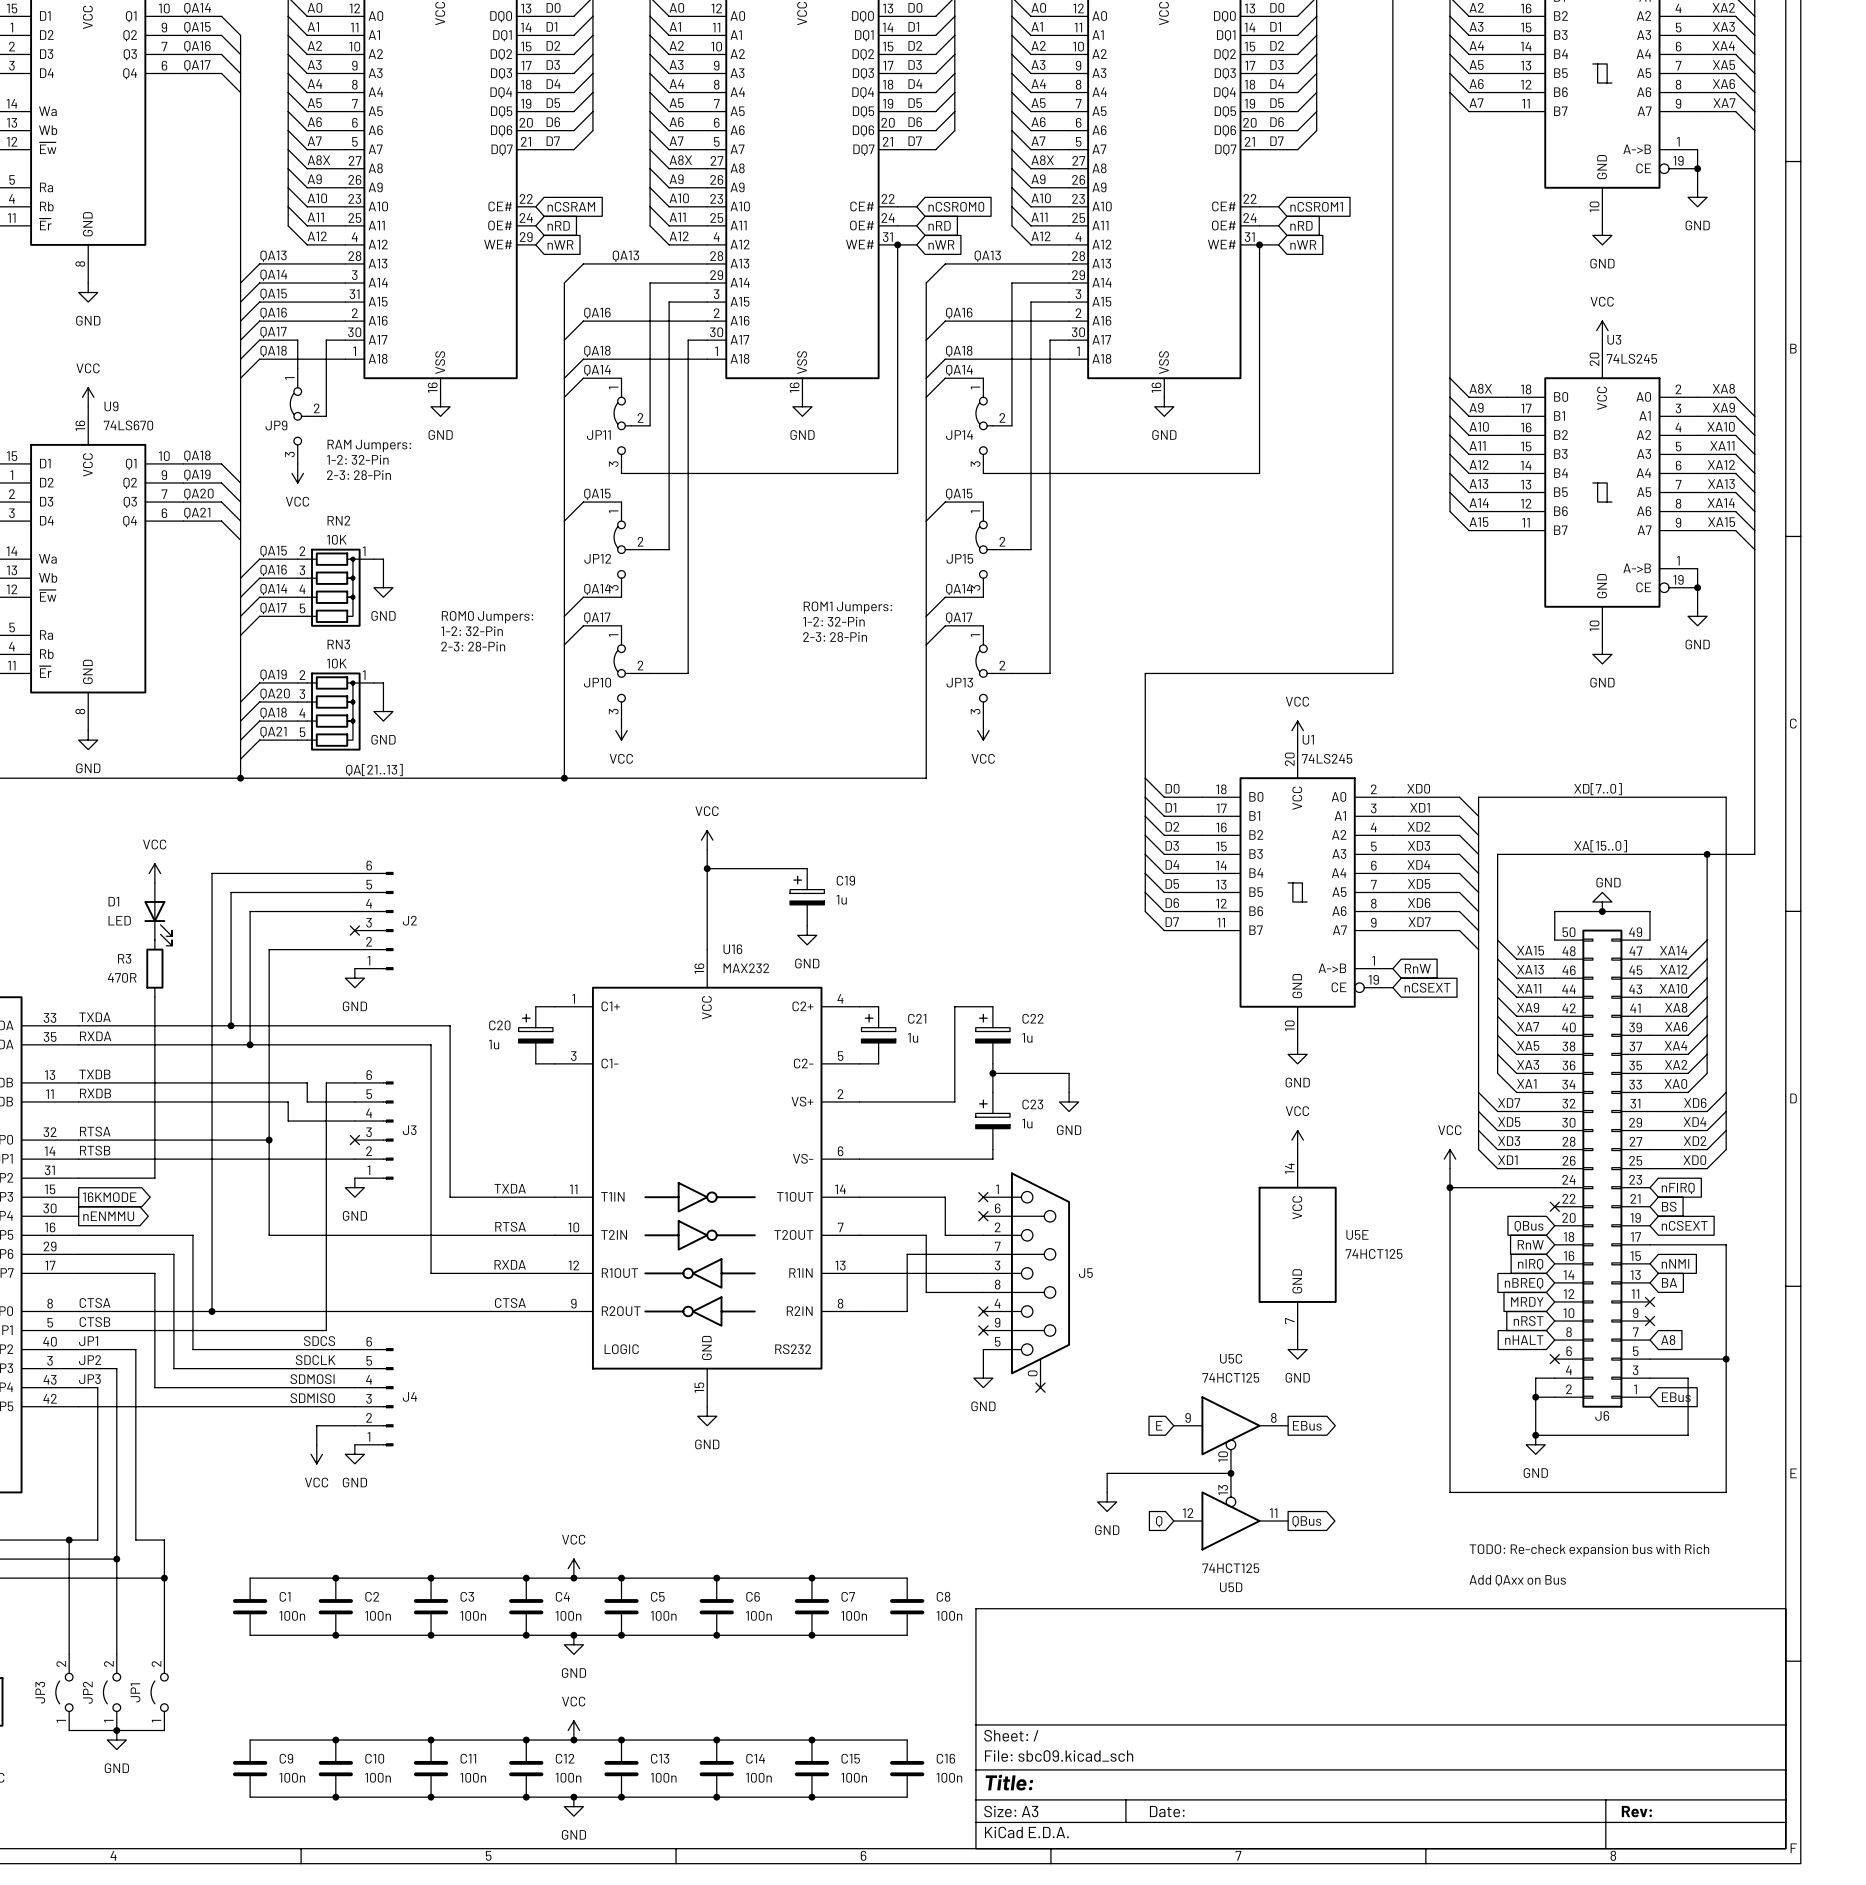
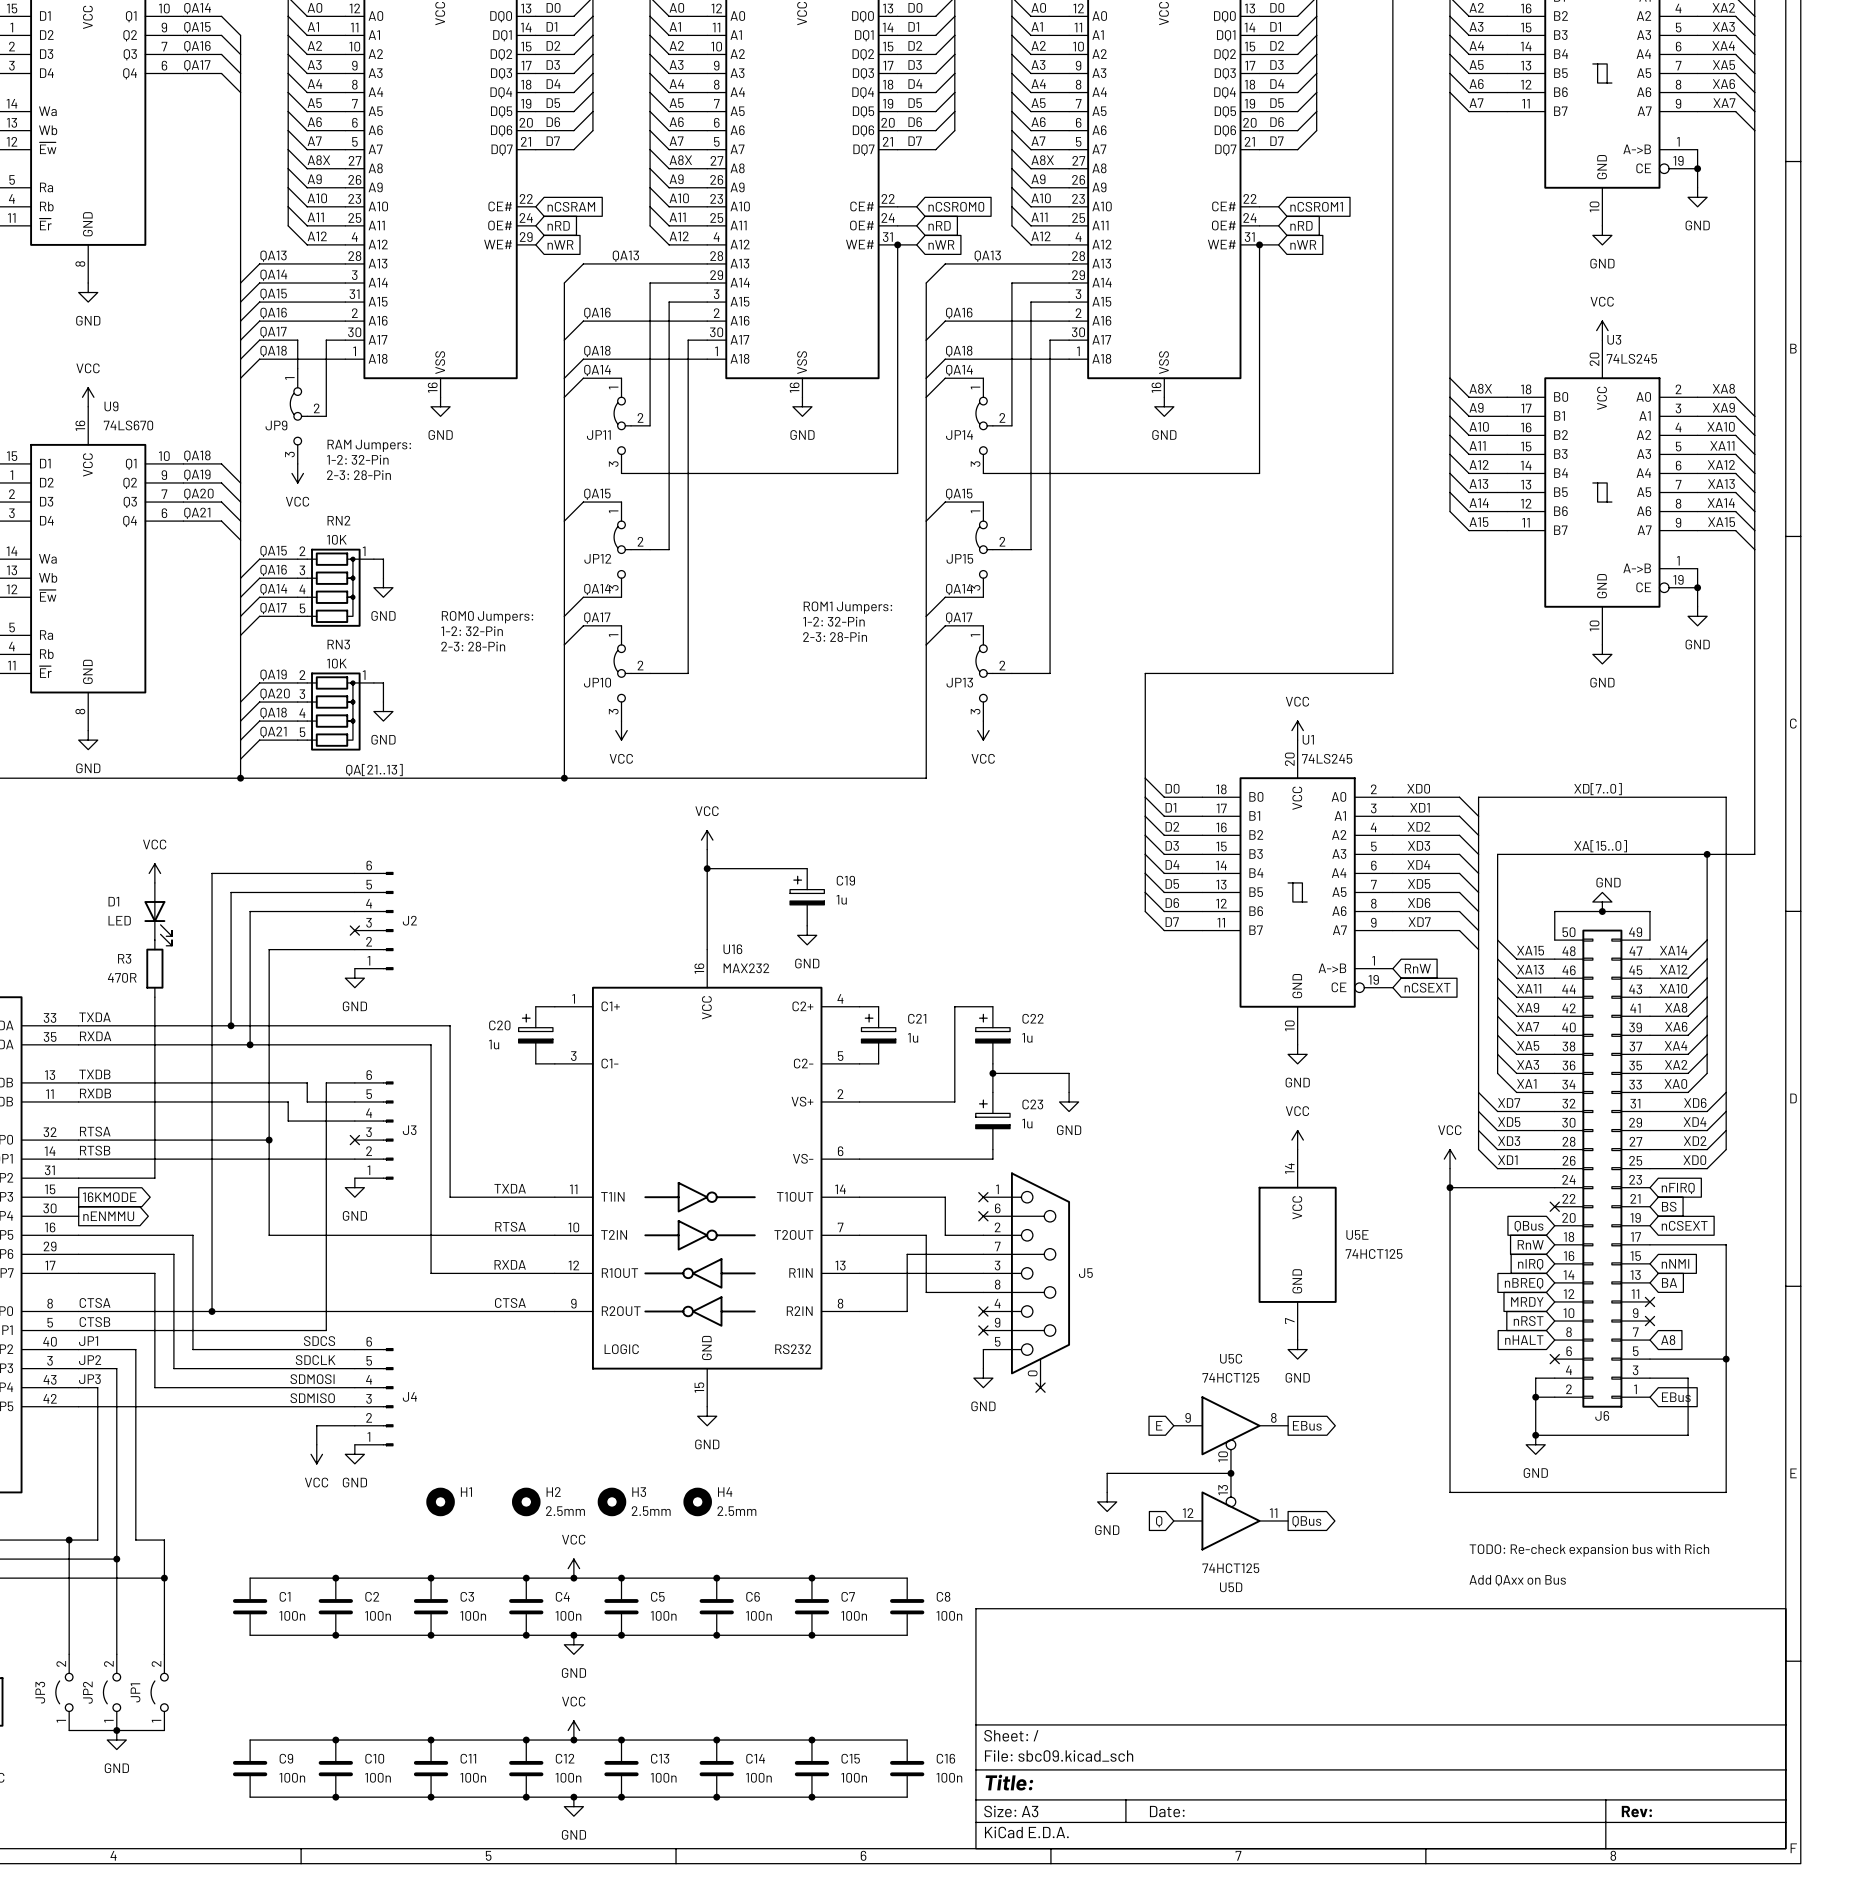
H1: none -> (440, 1501)
H2: none -> 2.5mm (526, 1501)
H3: none -> 2.5mm (611, 1501)
H4: none -> 2.5mm (697, 1501)

